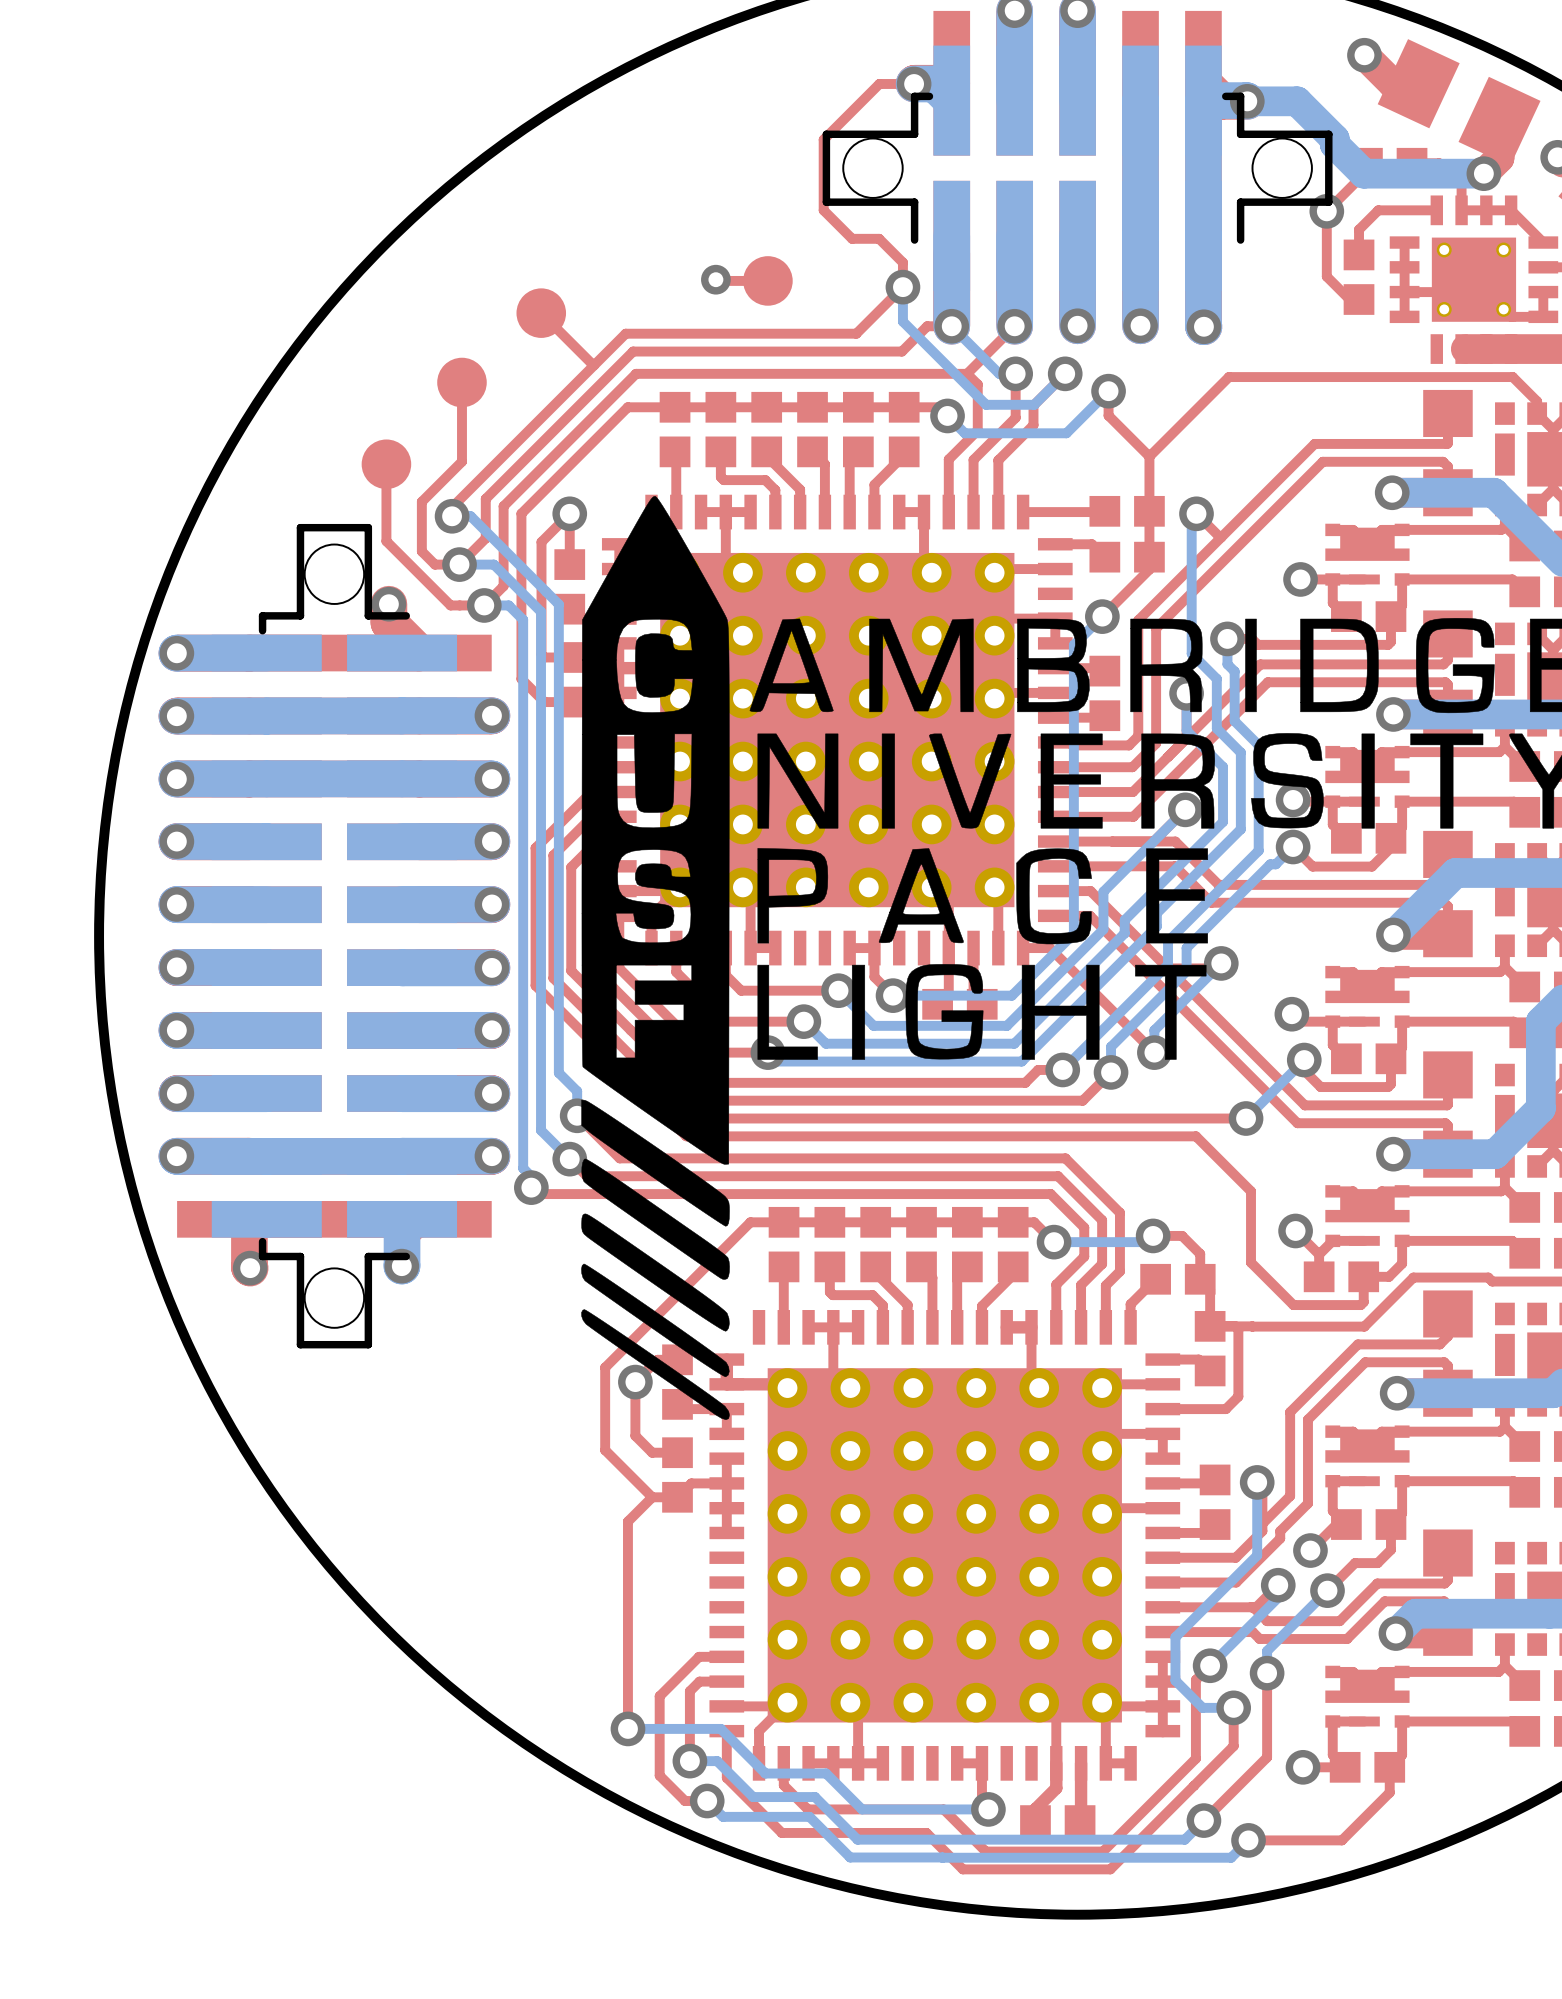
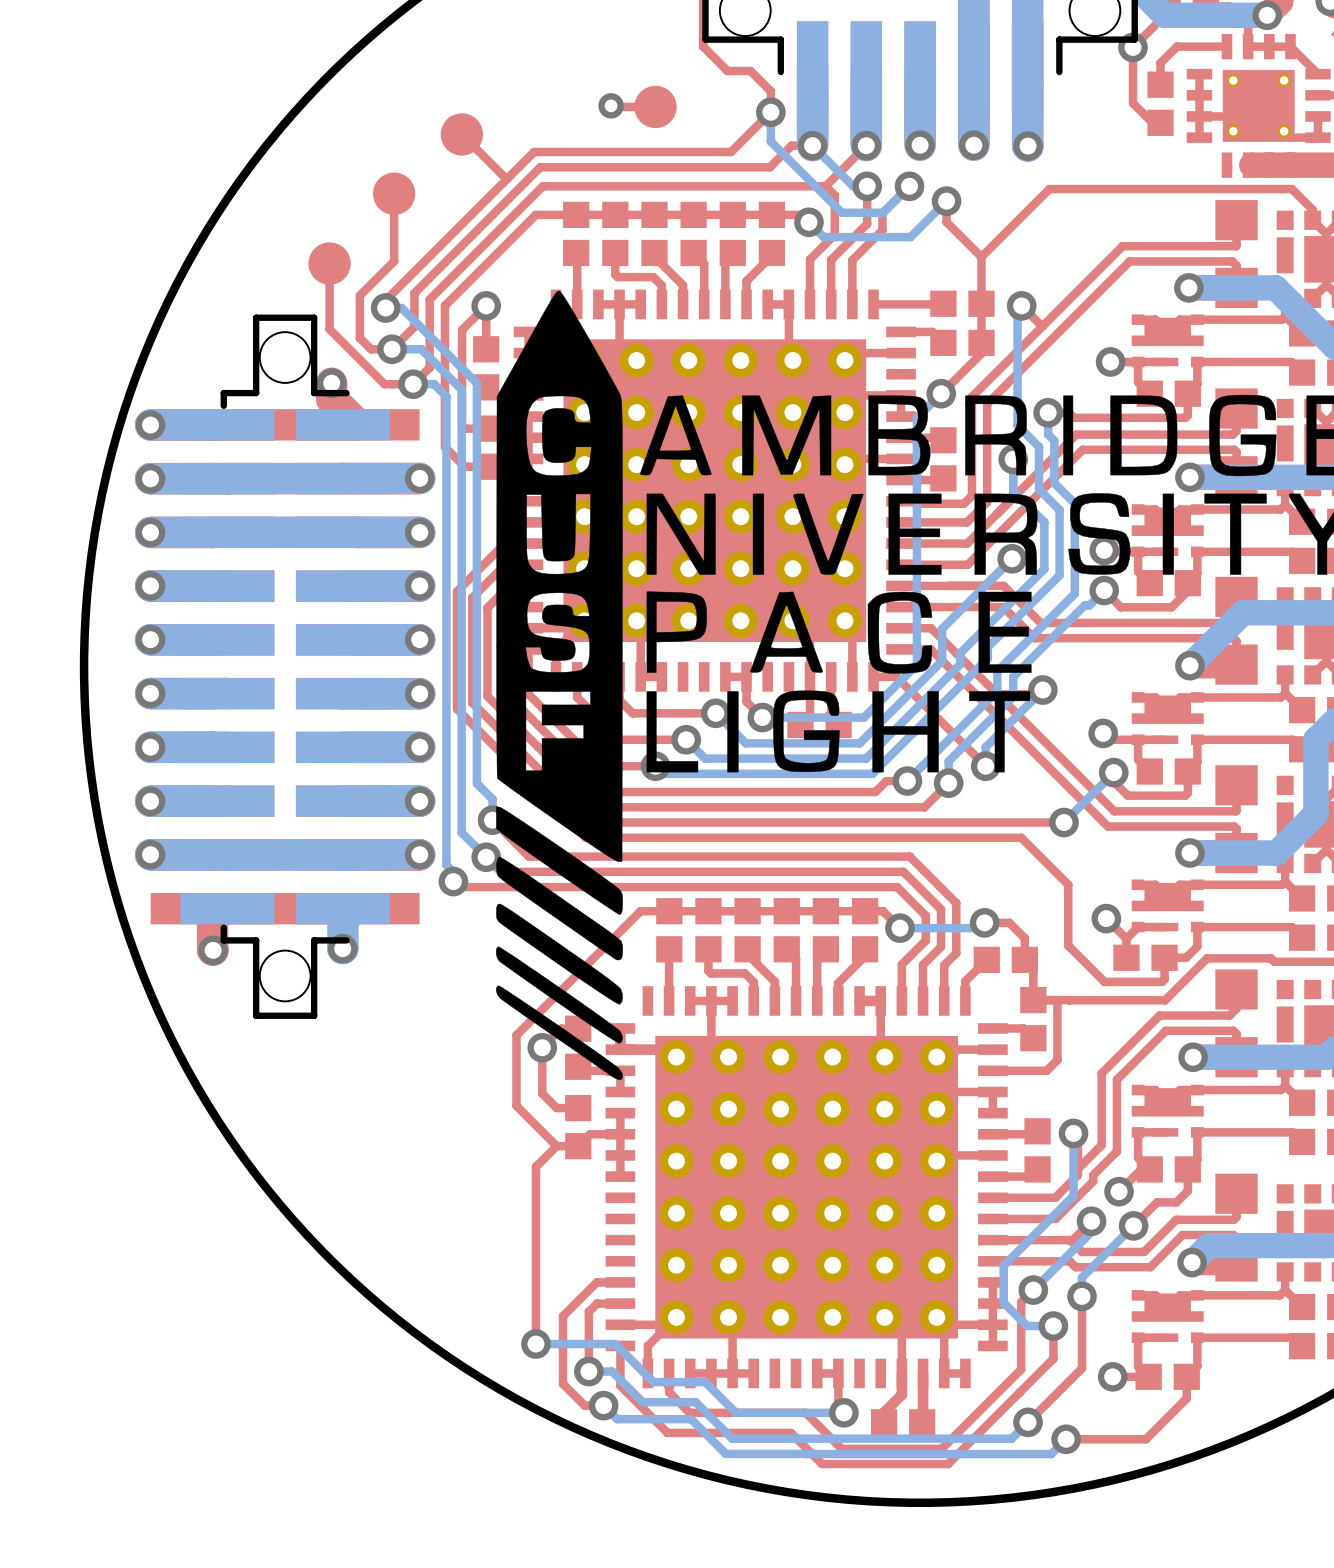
part footprint: [601, 494, 1073, 966] -> [513, 289, 916, 692]
part footprint: [709, 1310, 1181, 1781] -> [605, 986, 1008, 1389]

